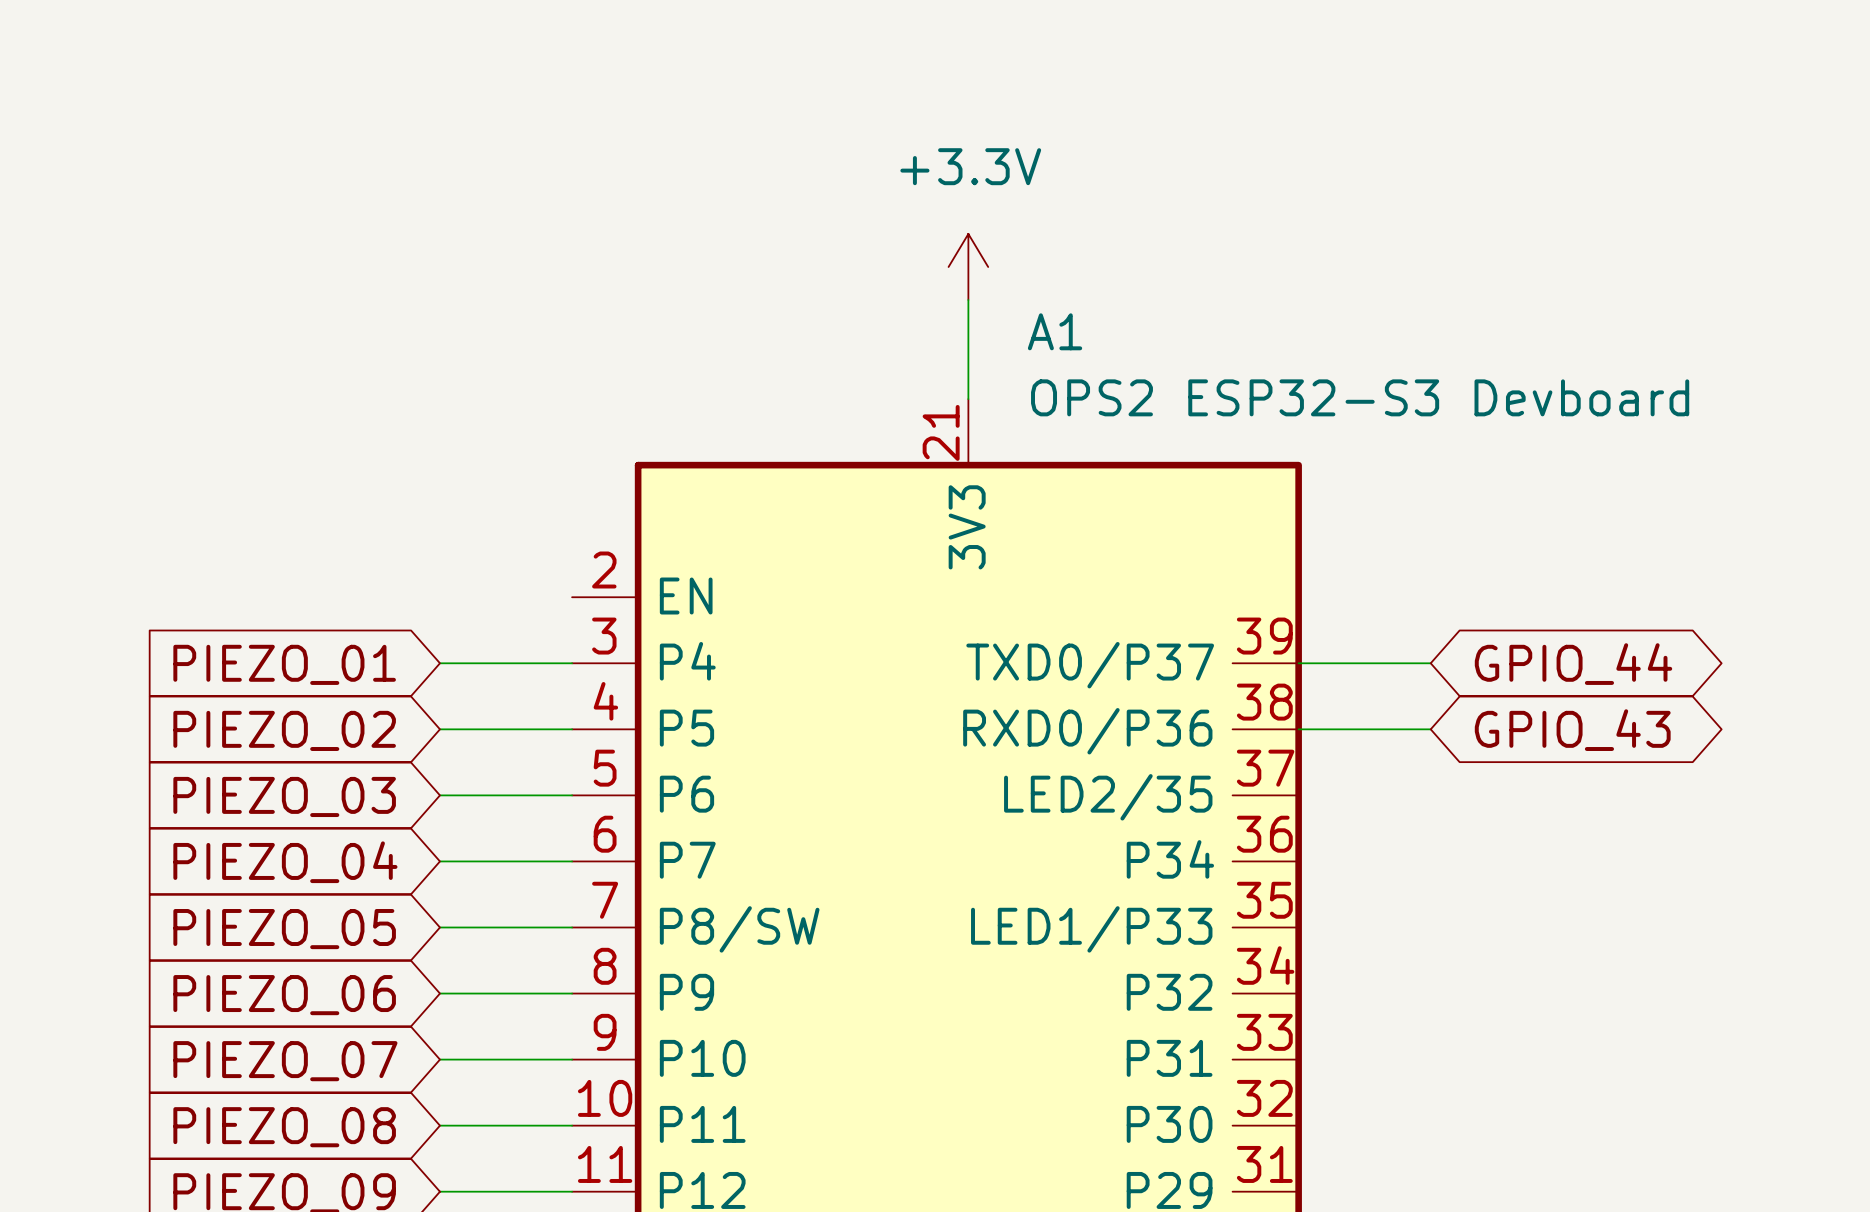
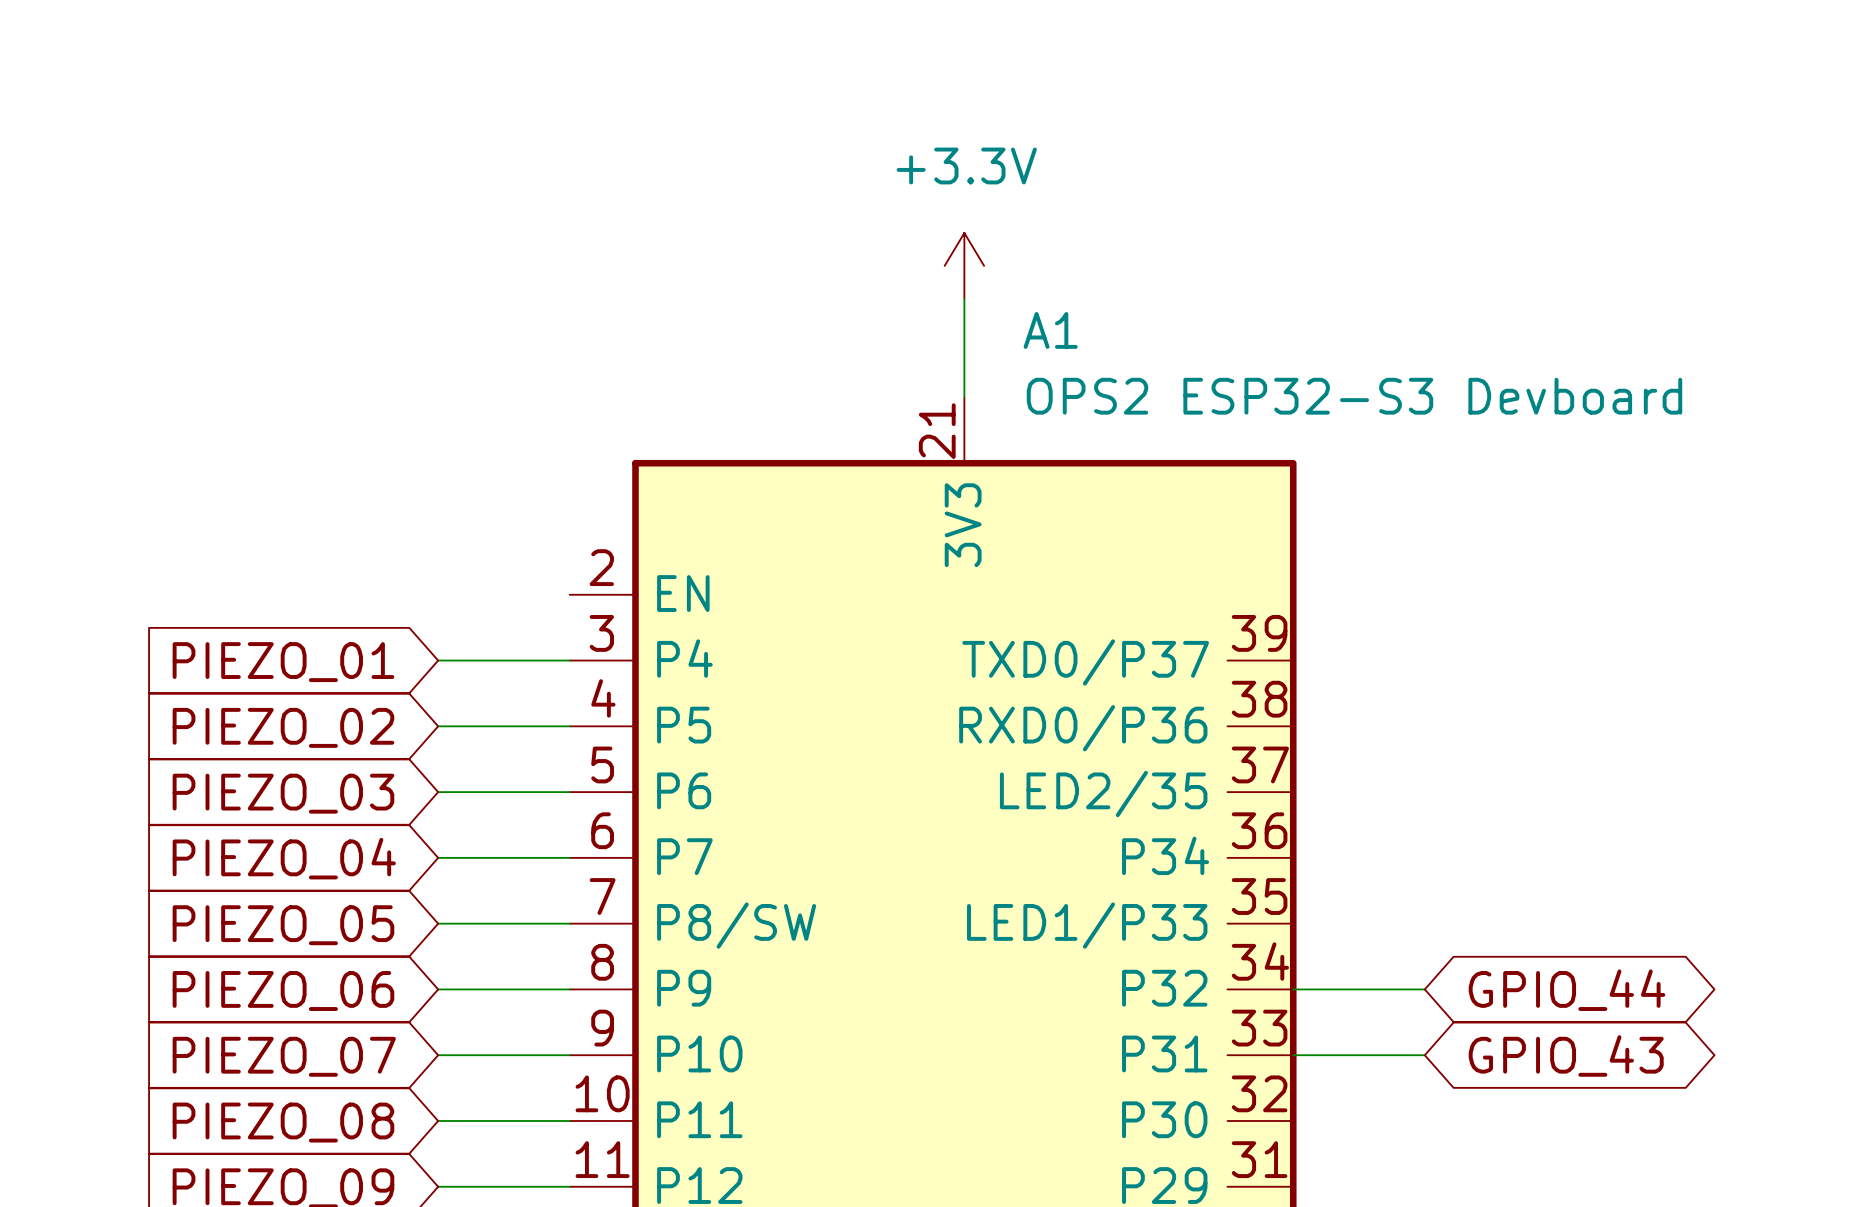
wire: (1298, 663) (1430, 663) -> (1293, 989) (1424, 989)
global label position: GPIO_44 (1573, 664) -> GPIO_44 (1566, 990)
wire: (1298, 729) (1430, 729) -> (1293, 1055) (1424, 1055)
global label position: GPIO_43 (1572, 730) -> GPIO_43 (1566, 1055)

